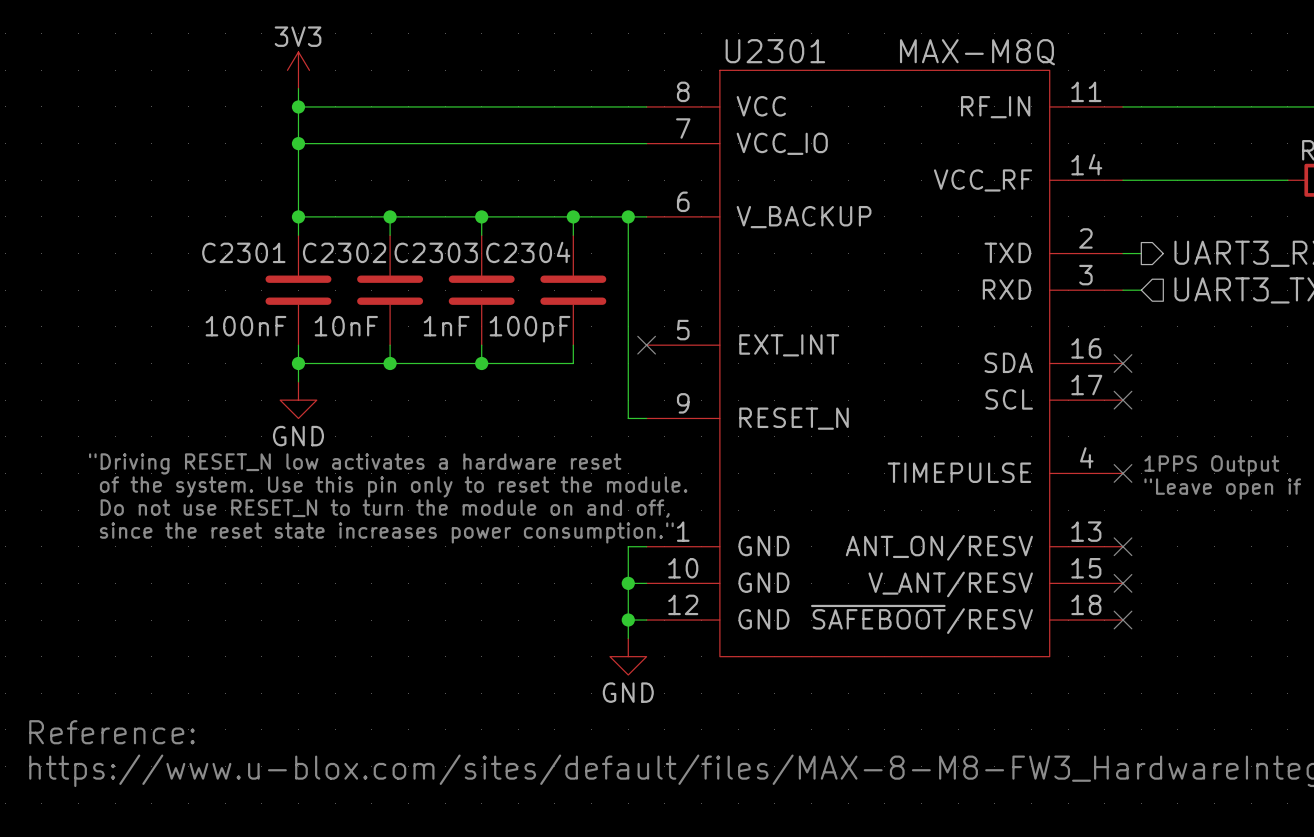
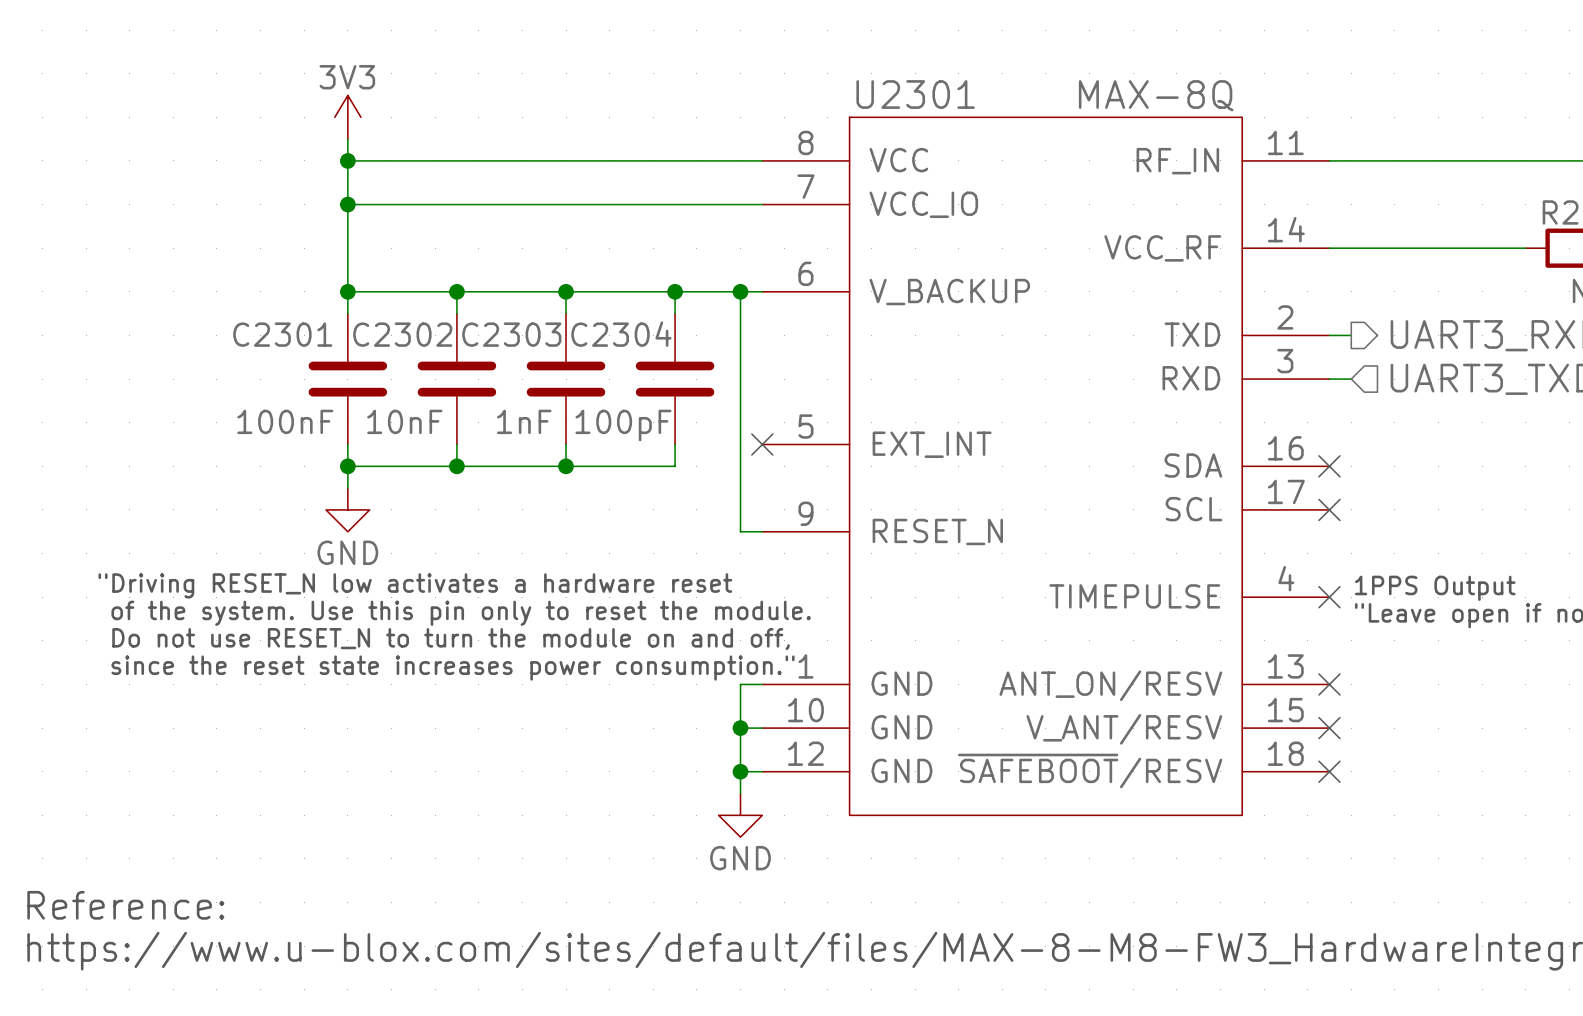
U2301 value: MAX-M8Q (977, 52) -> MAX-8Q (1156, 95)

